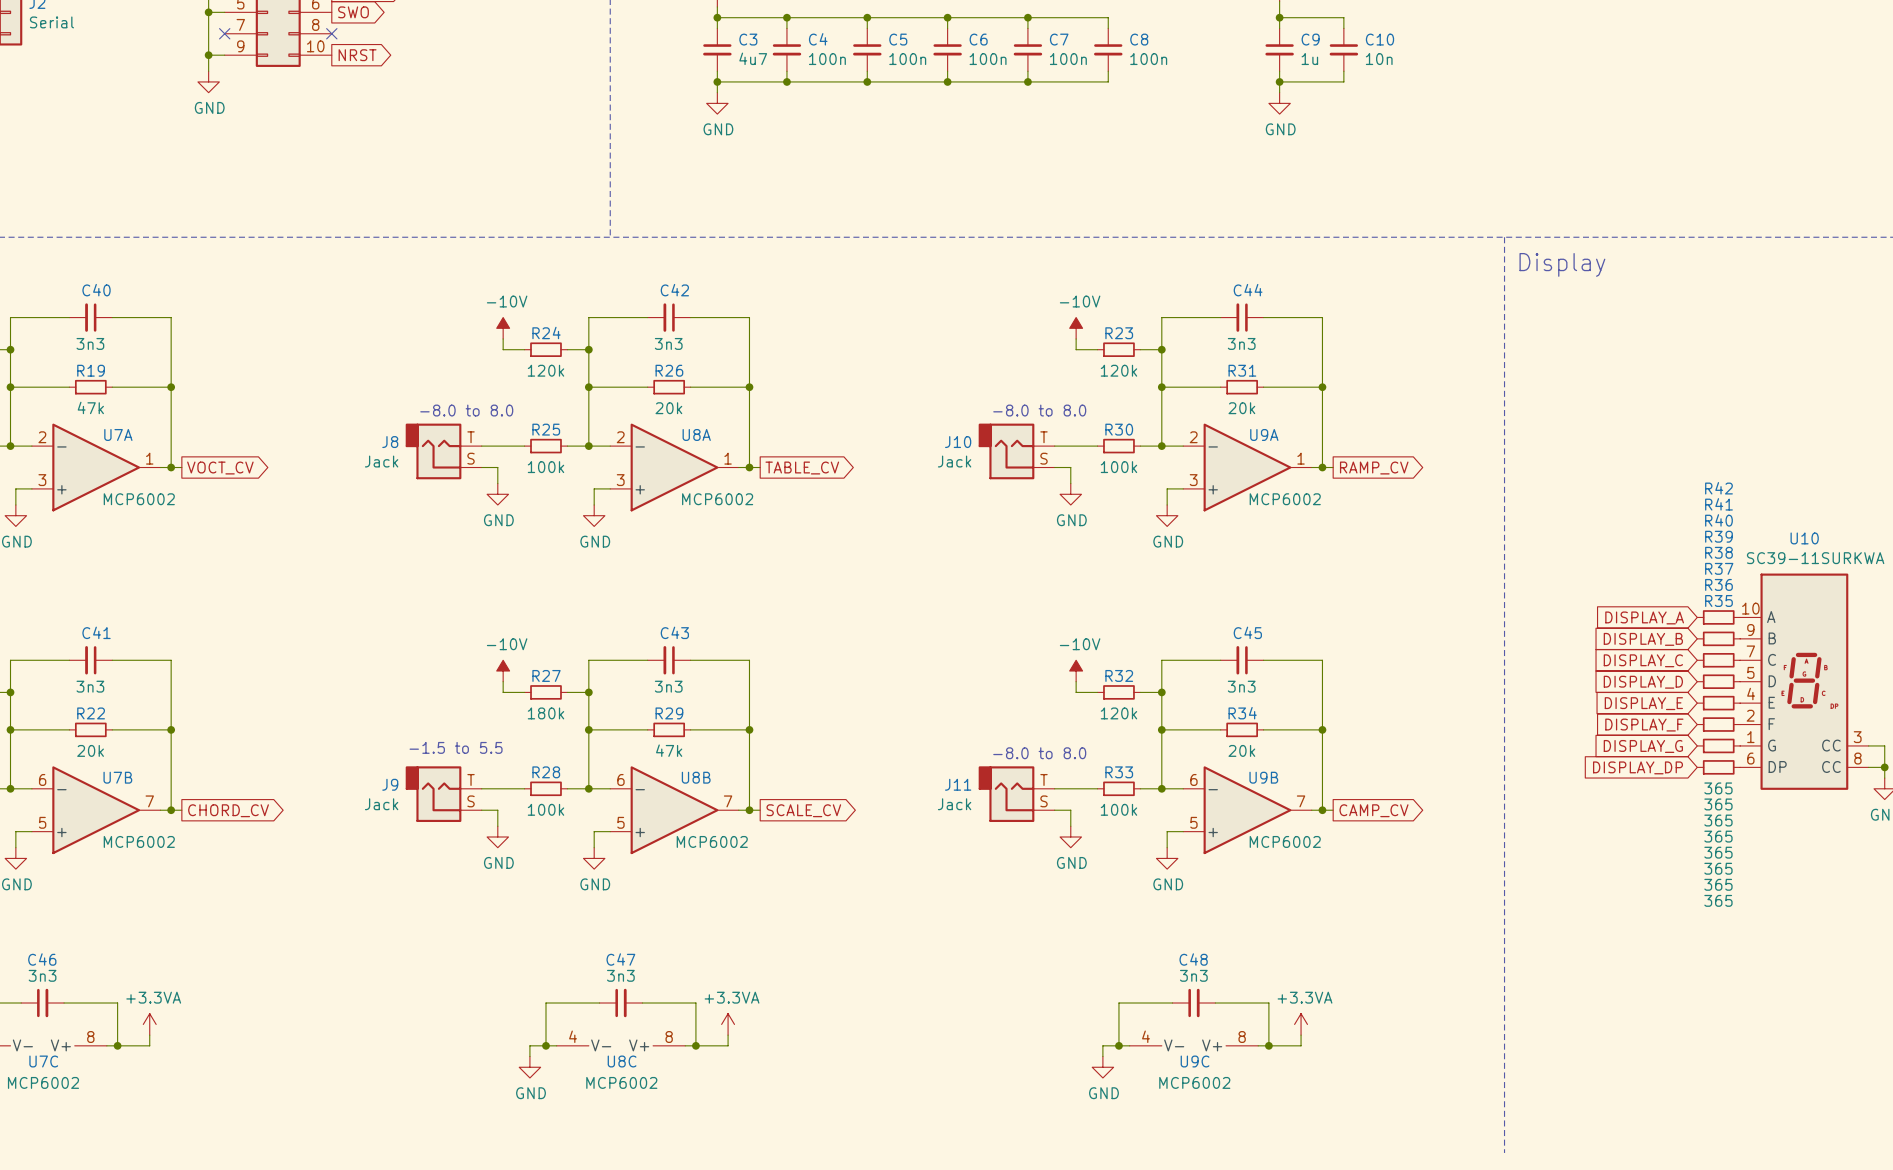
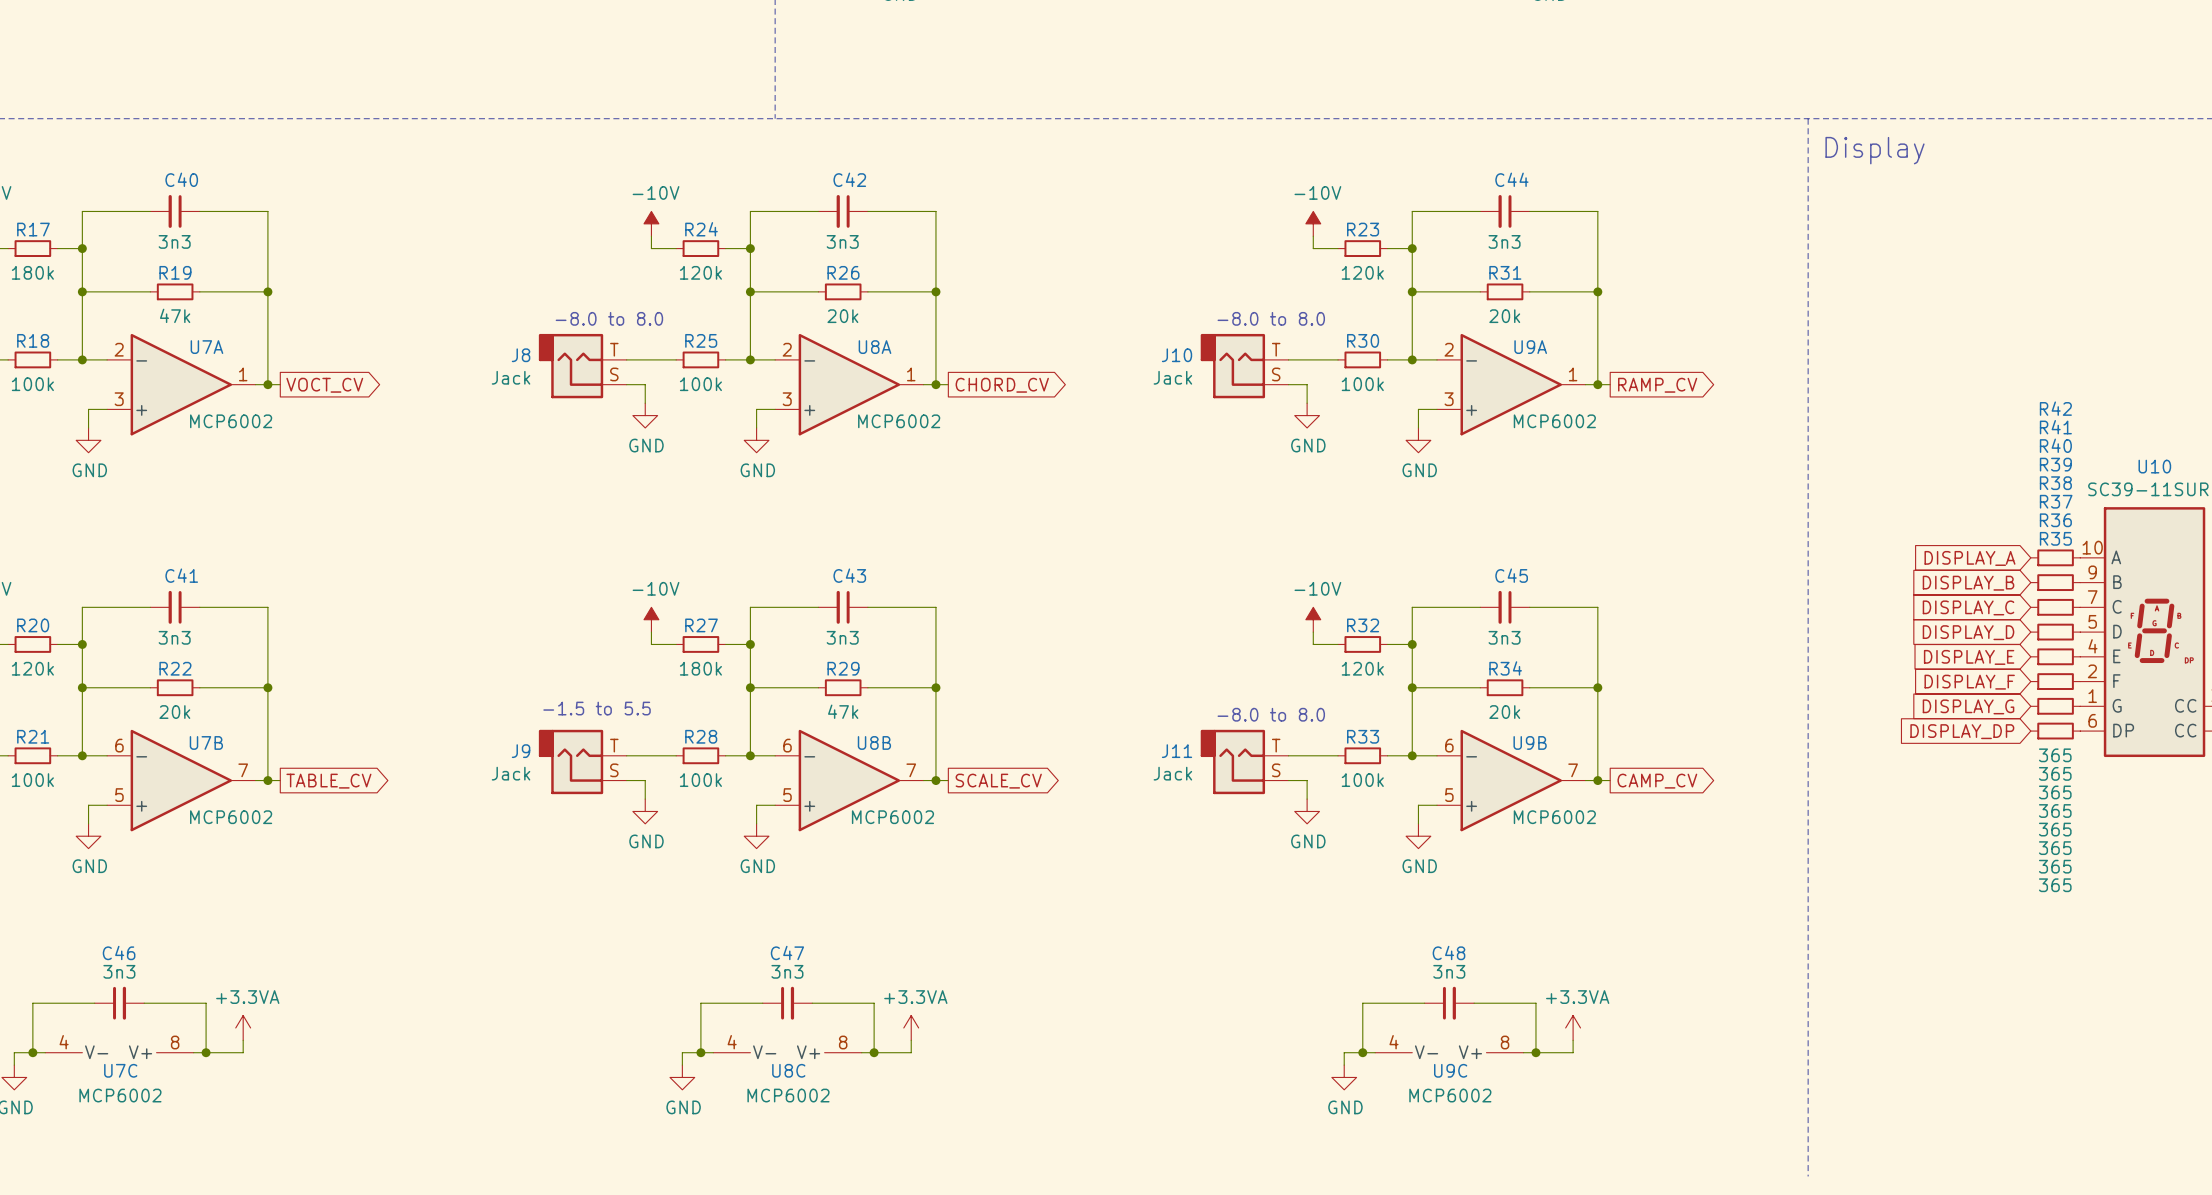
global label: TABLE_CV (802, 468) -> CHORD_CV (1002, 385)
global label: CHORD_CV (228, 810) -> TABLE_CV (328, 781)

